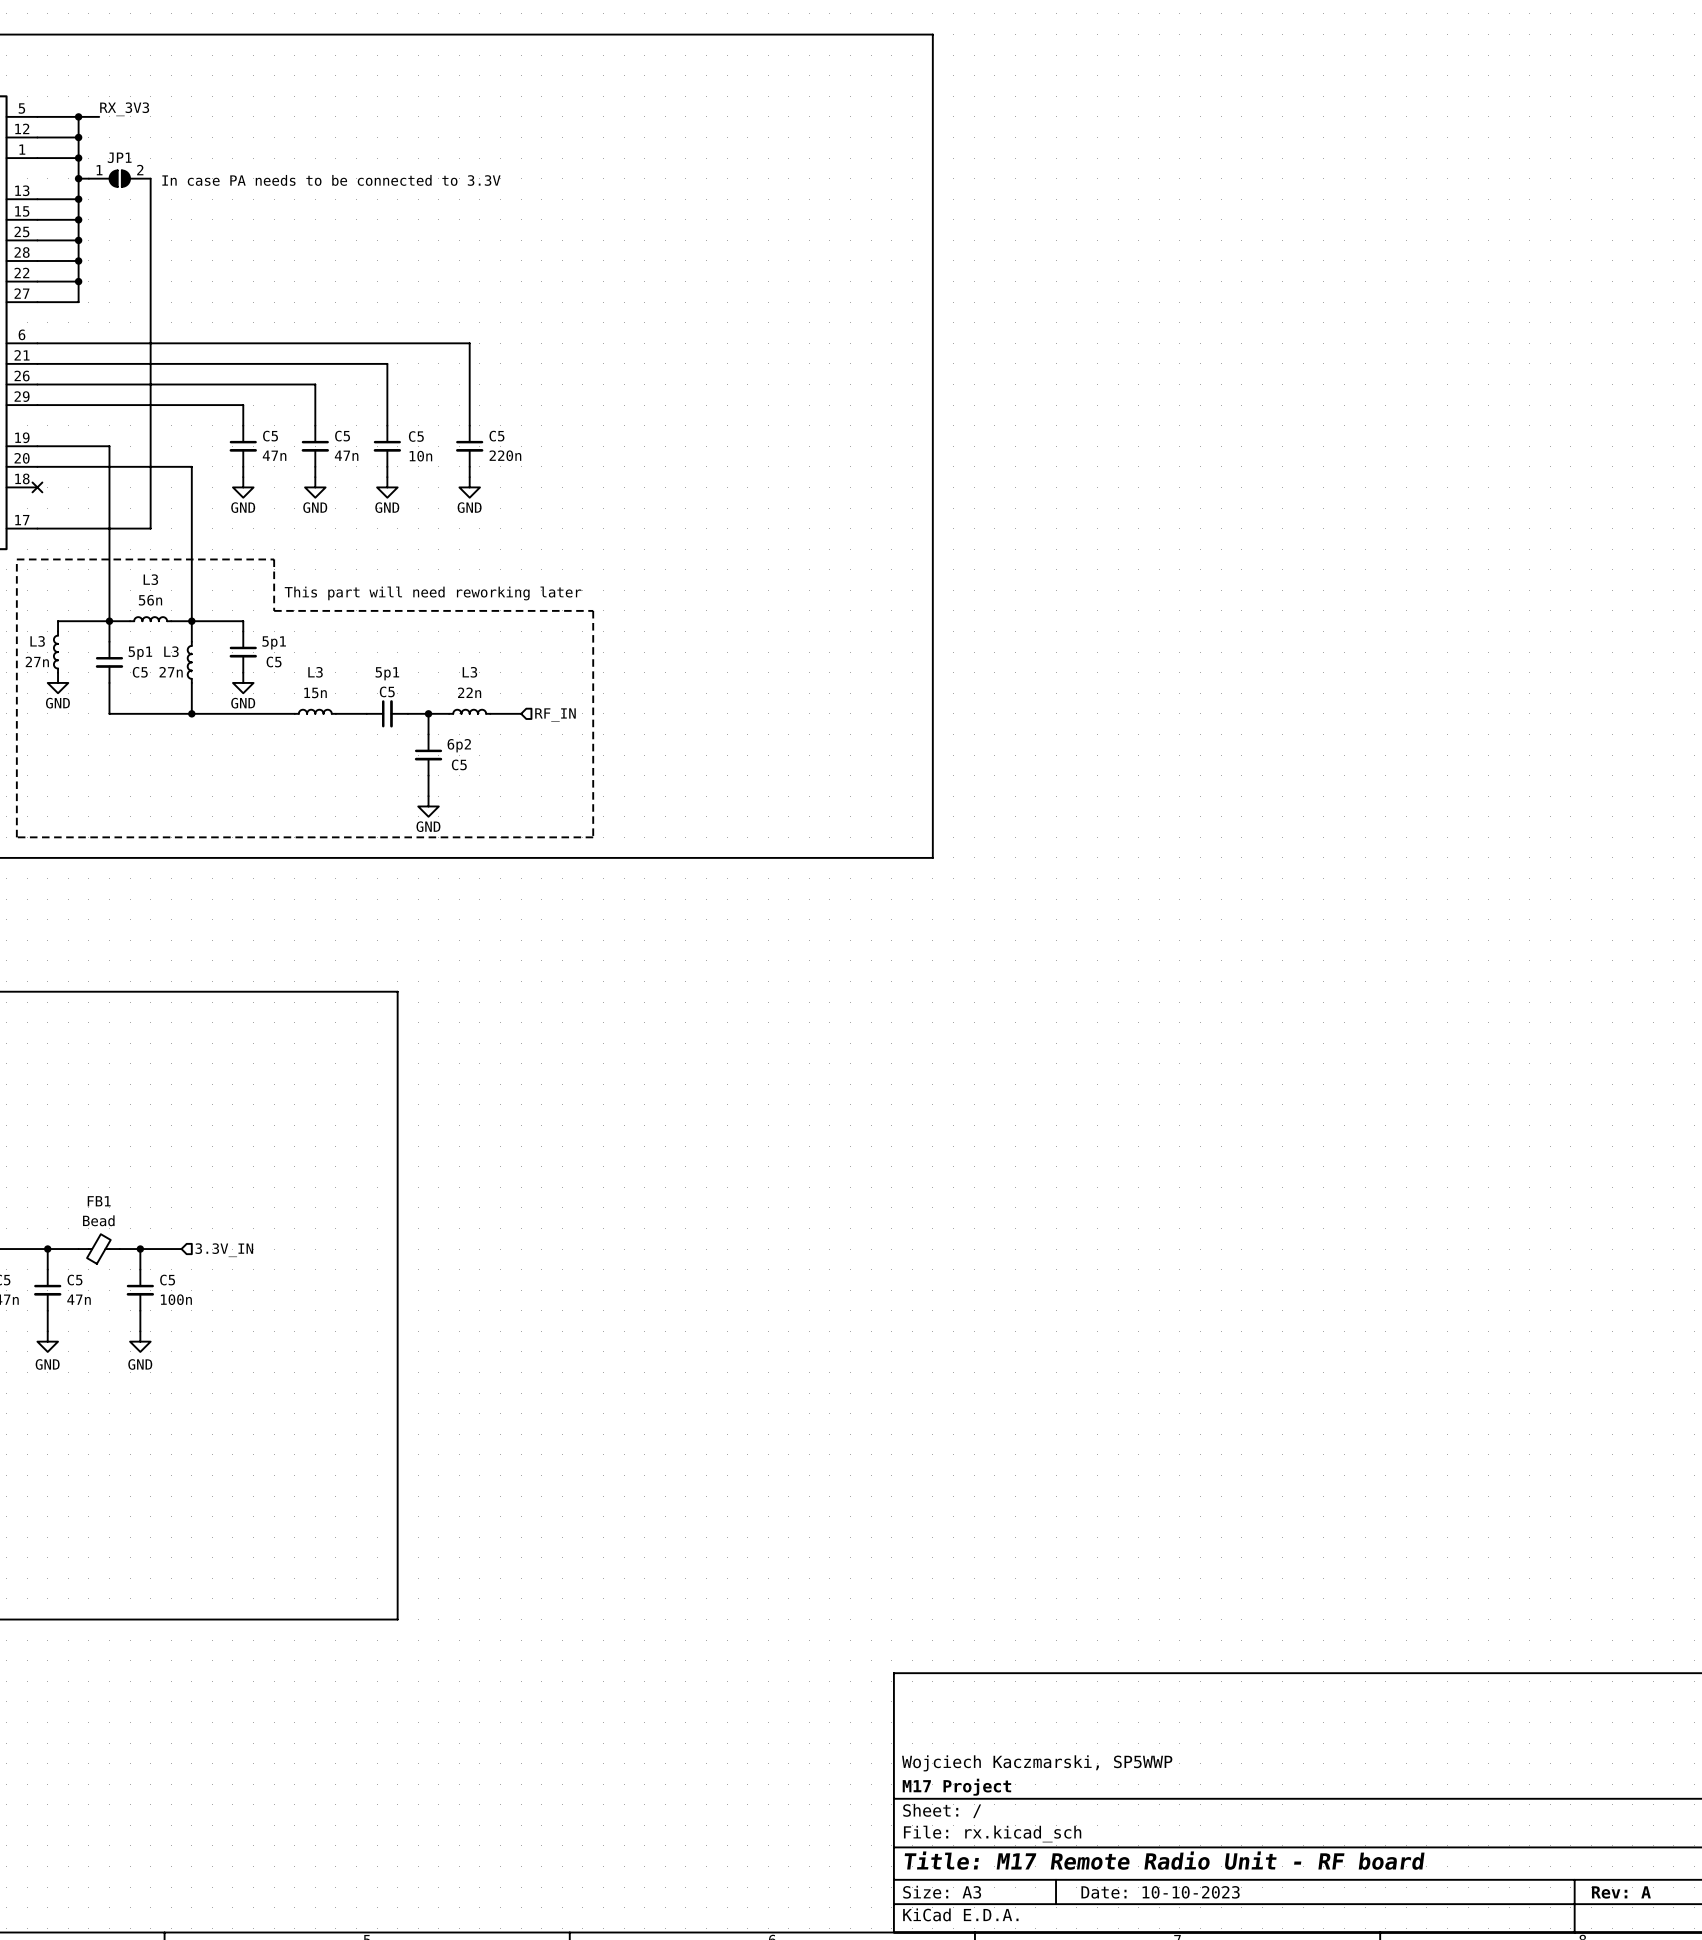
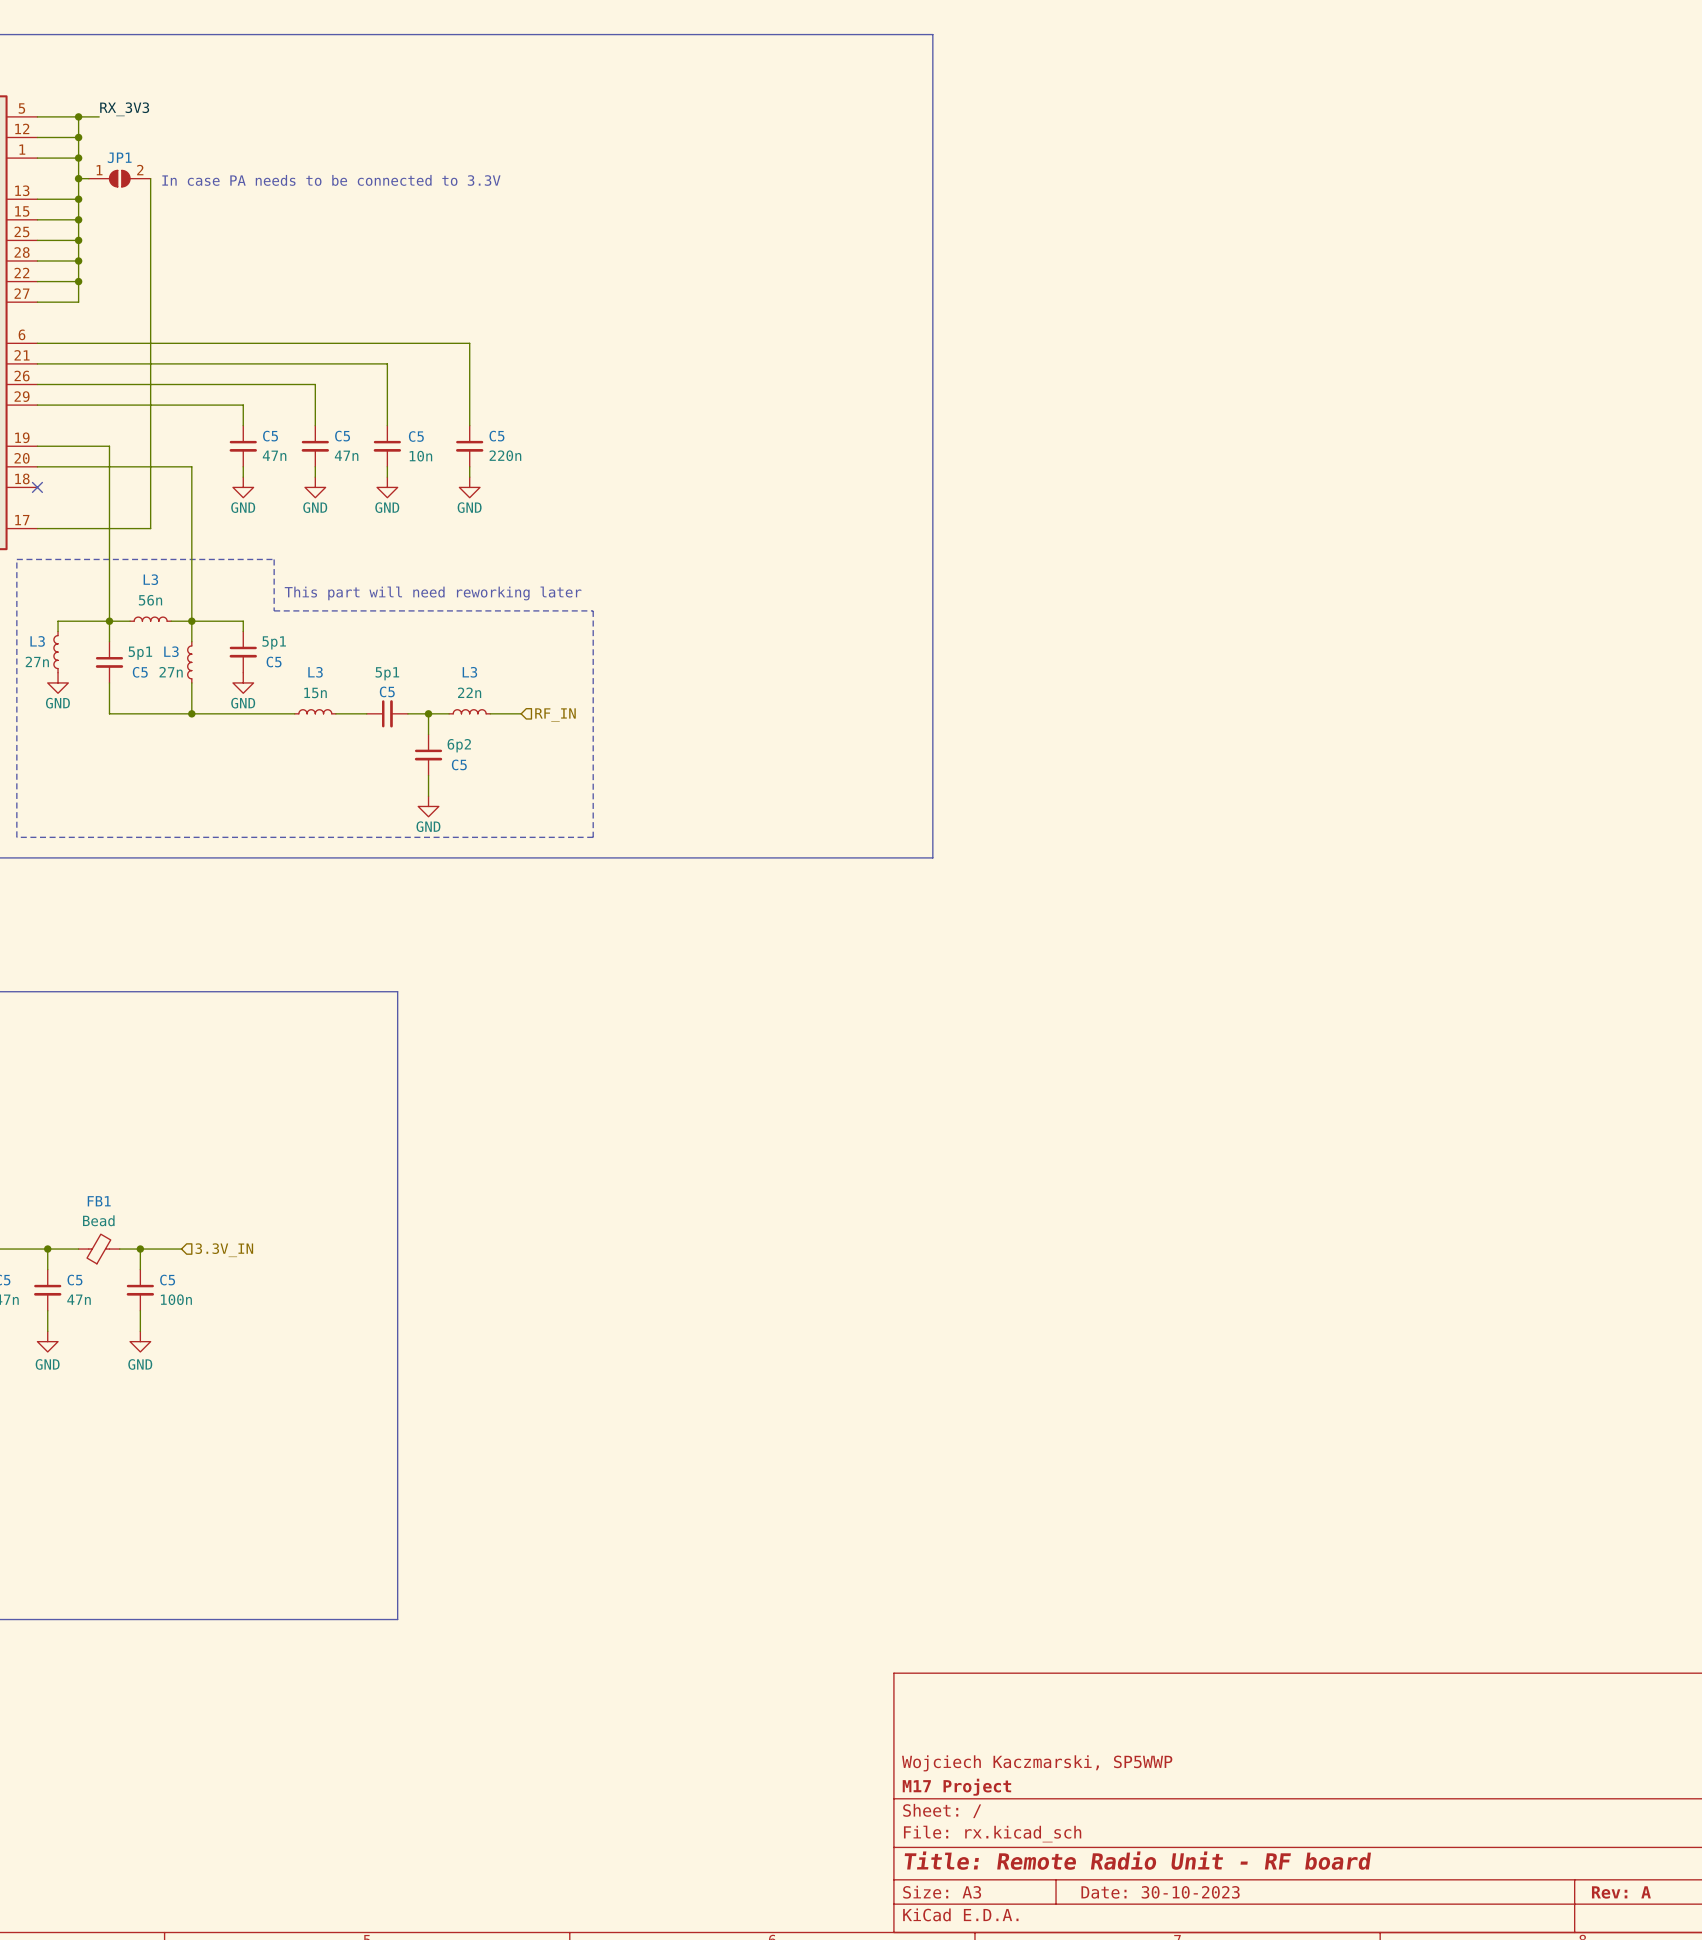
title block: Title: M17 Remote Radio Unit - RF board (1164, 1860) -> Title: Remote Radio Unit - RF board (1137, 1860)
title block: Date: 10-10-2023 (1160, 1892) -> Date: 30-10-2023 (1160, 1892)

